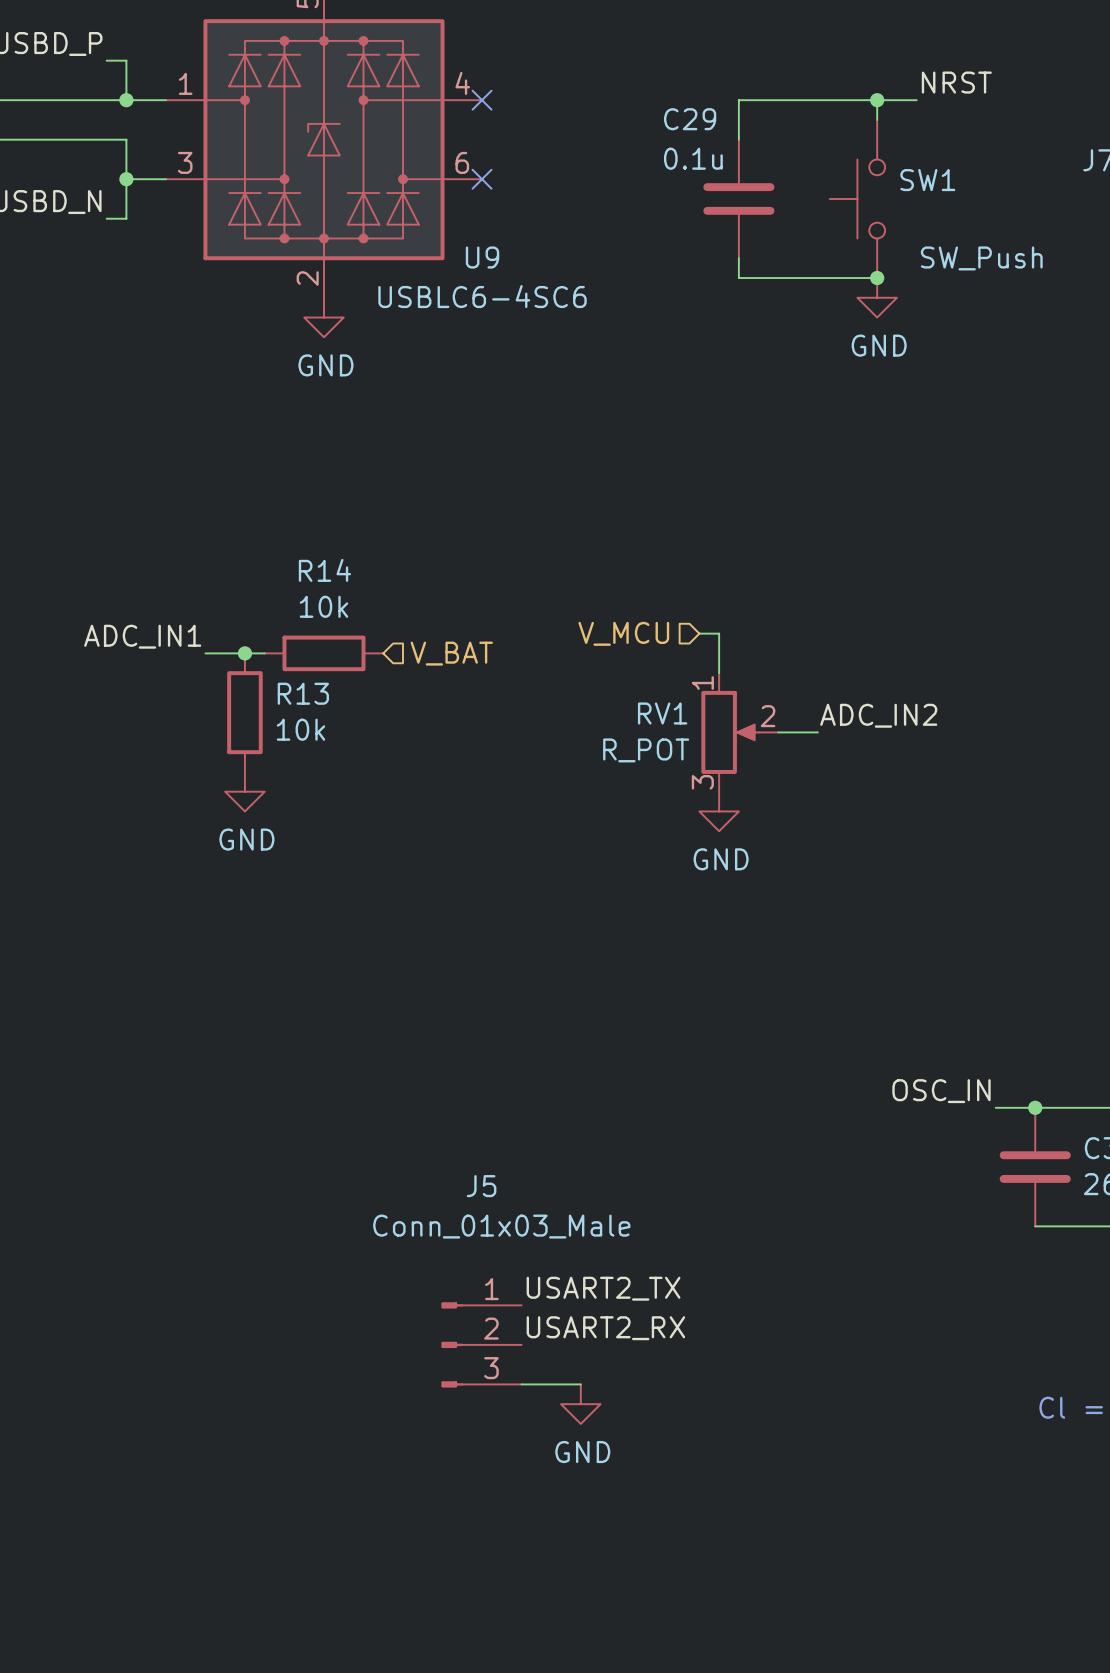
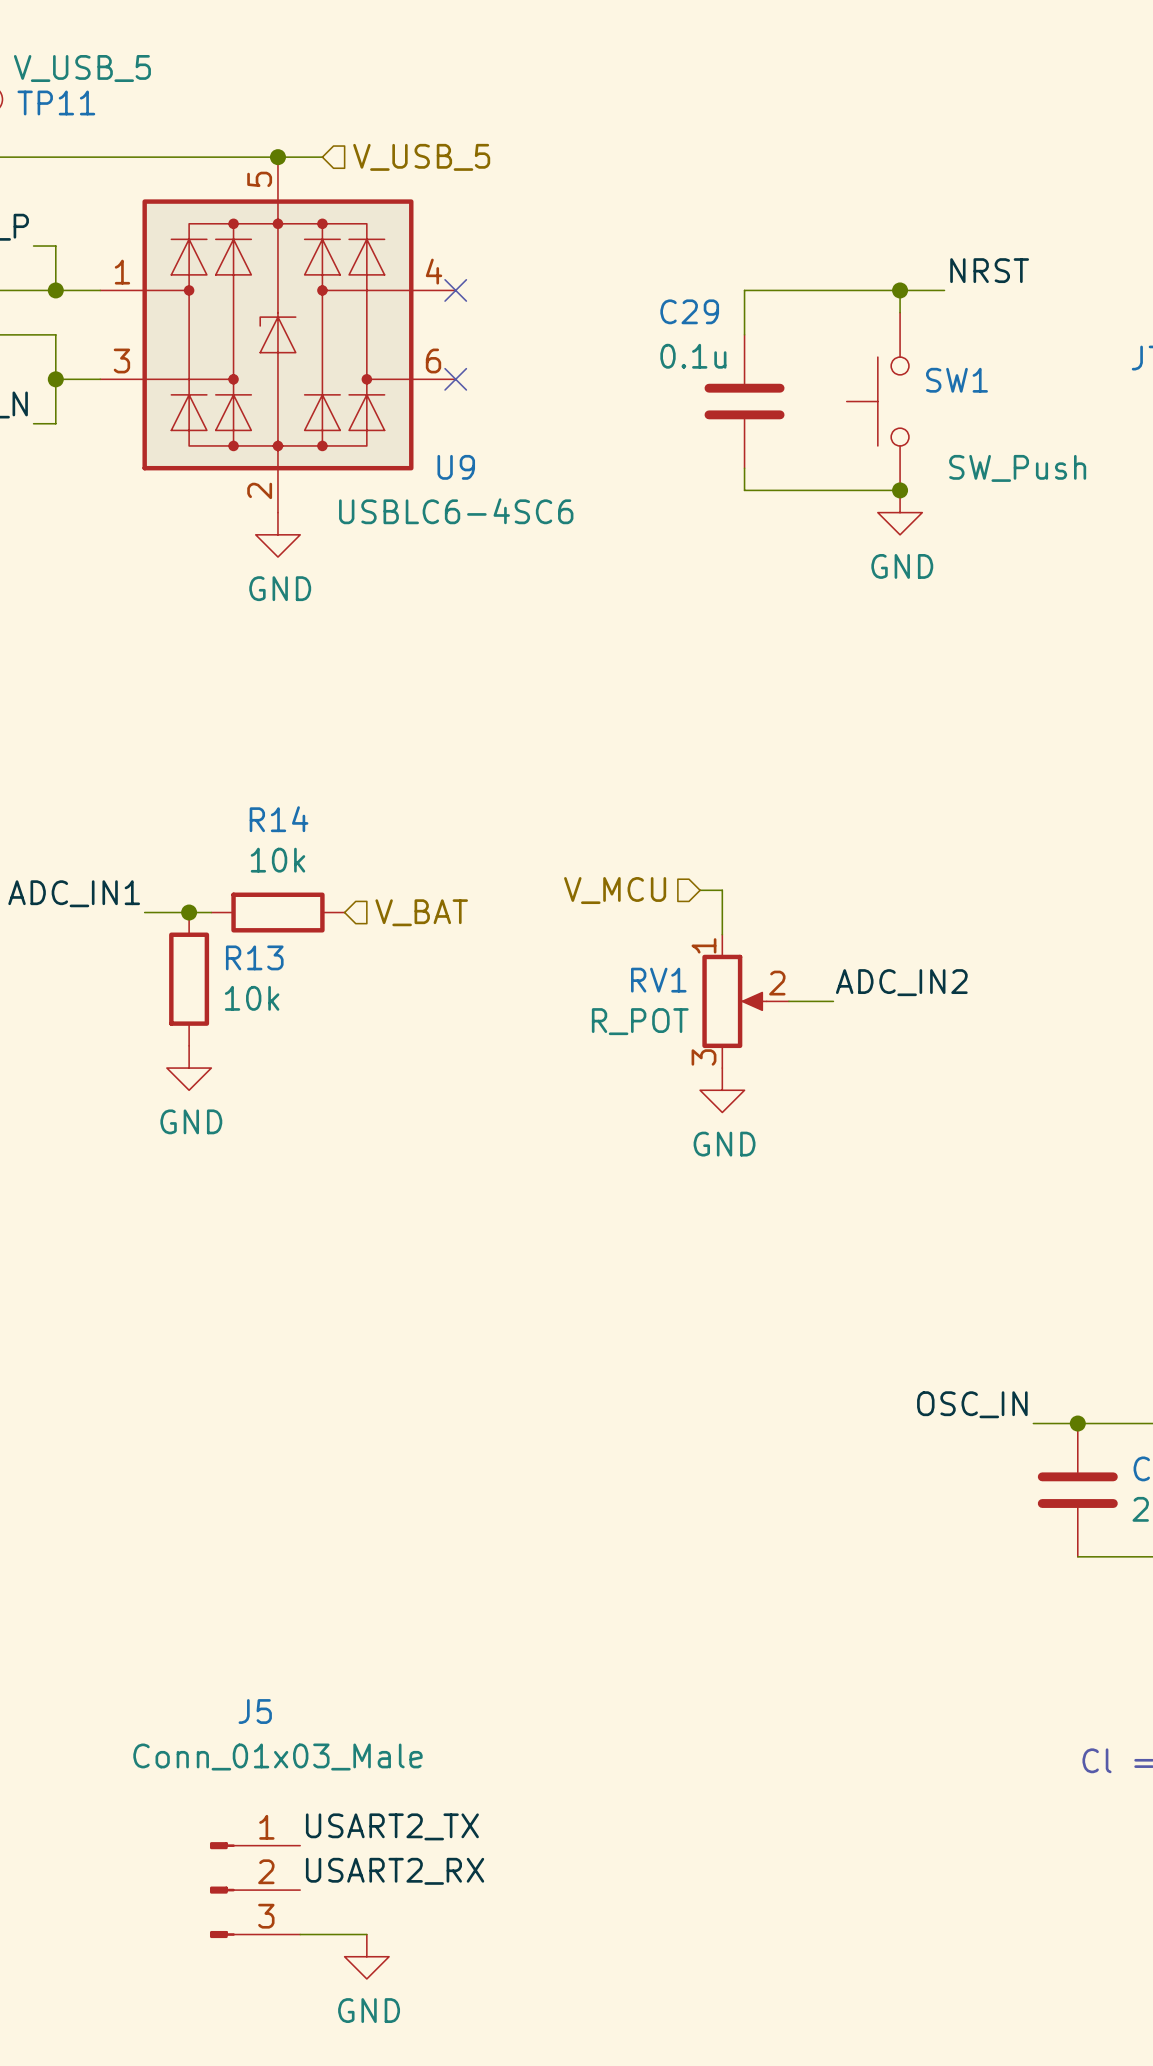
label position: USART2_TX (603, 1288) -> USART2_TX (392, 1826)
label position: USART2_RX (605, 1328) -> USART2_RX (395, 1871)
J5 position: (481, 1344) -> (255, 1890)
wire: (521, 1384) (580, 1384) -> (300, 1934) (366, 1934)
power symbol position: GND (580, 1404) -> GND (366, 1956)

